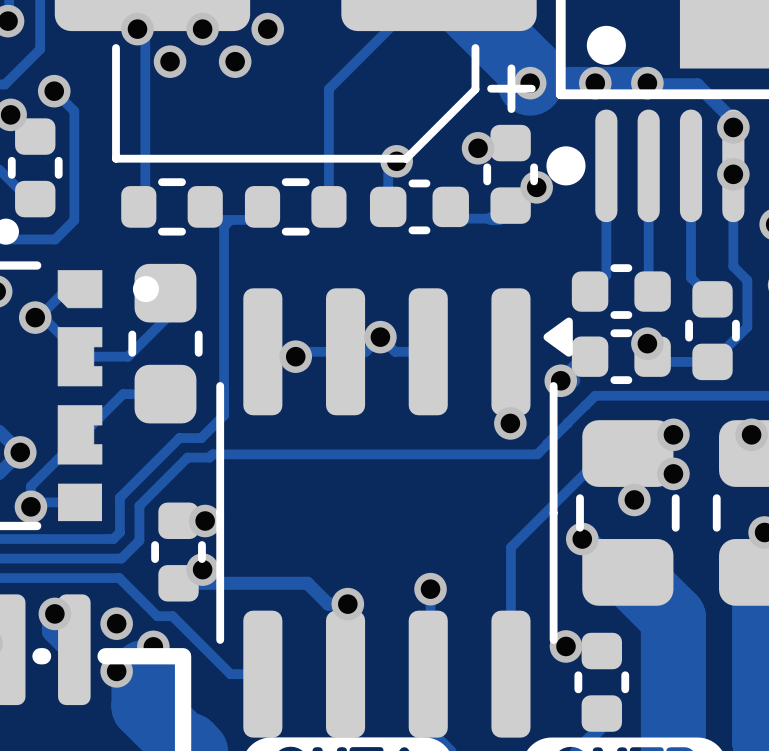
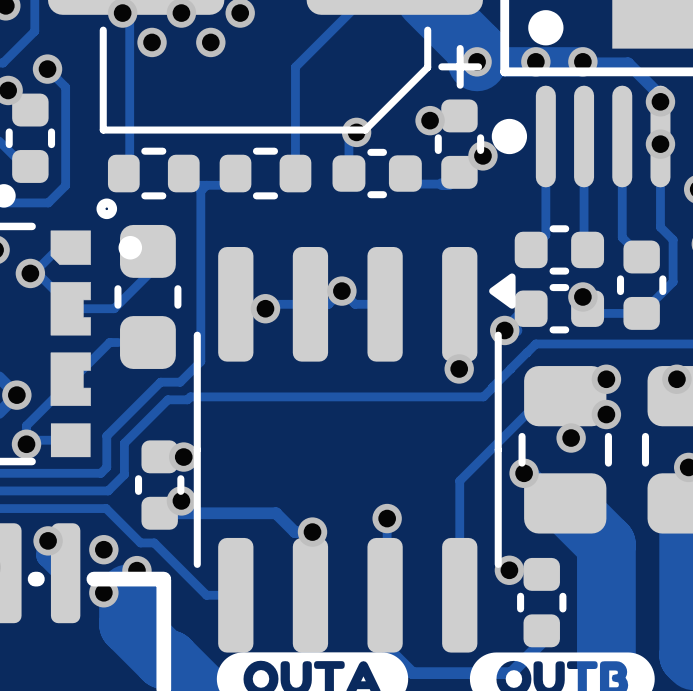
drawing: none -> [96, 198, 118, 220]

